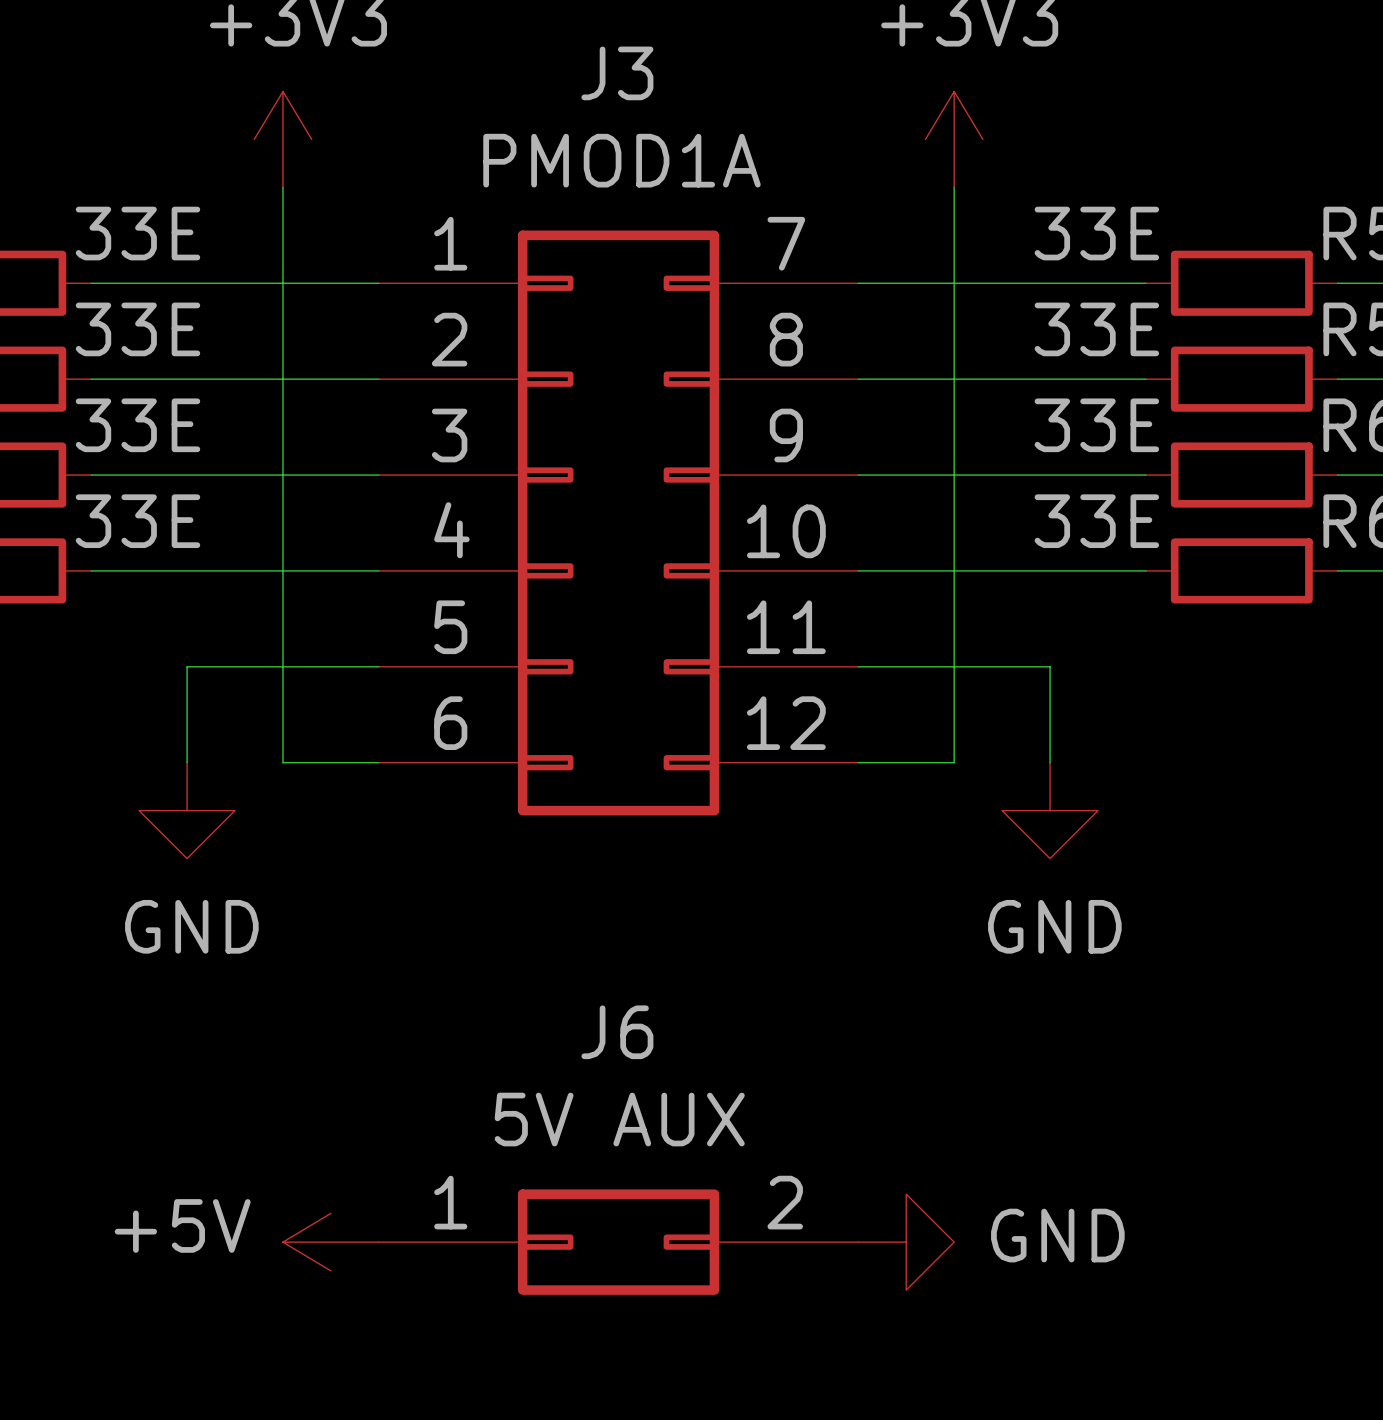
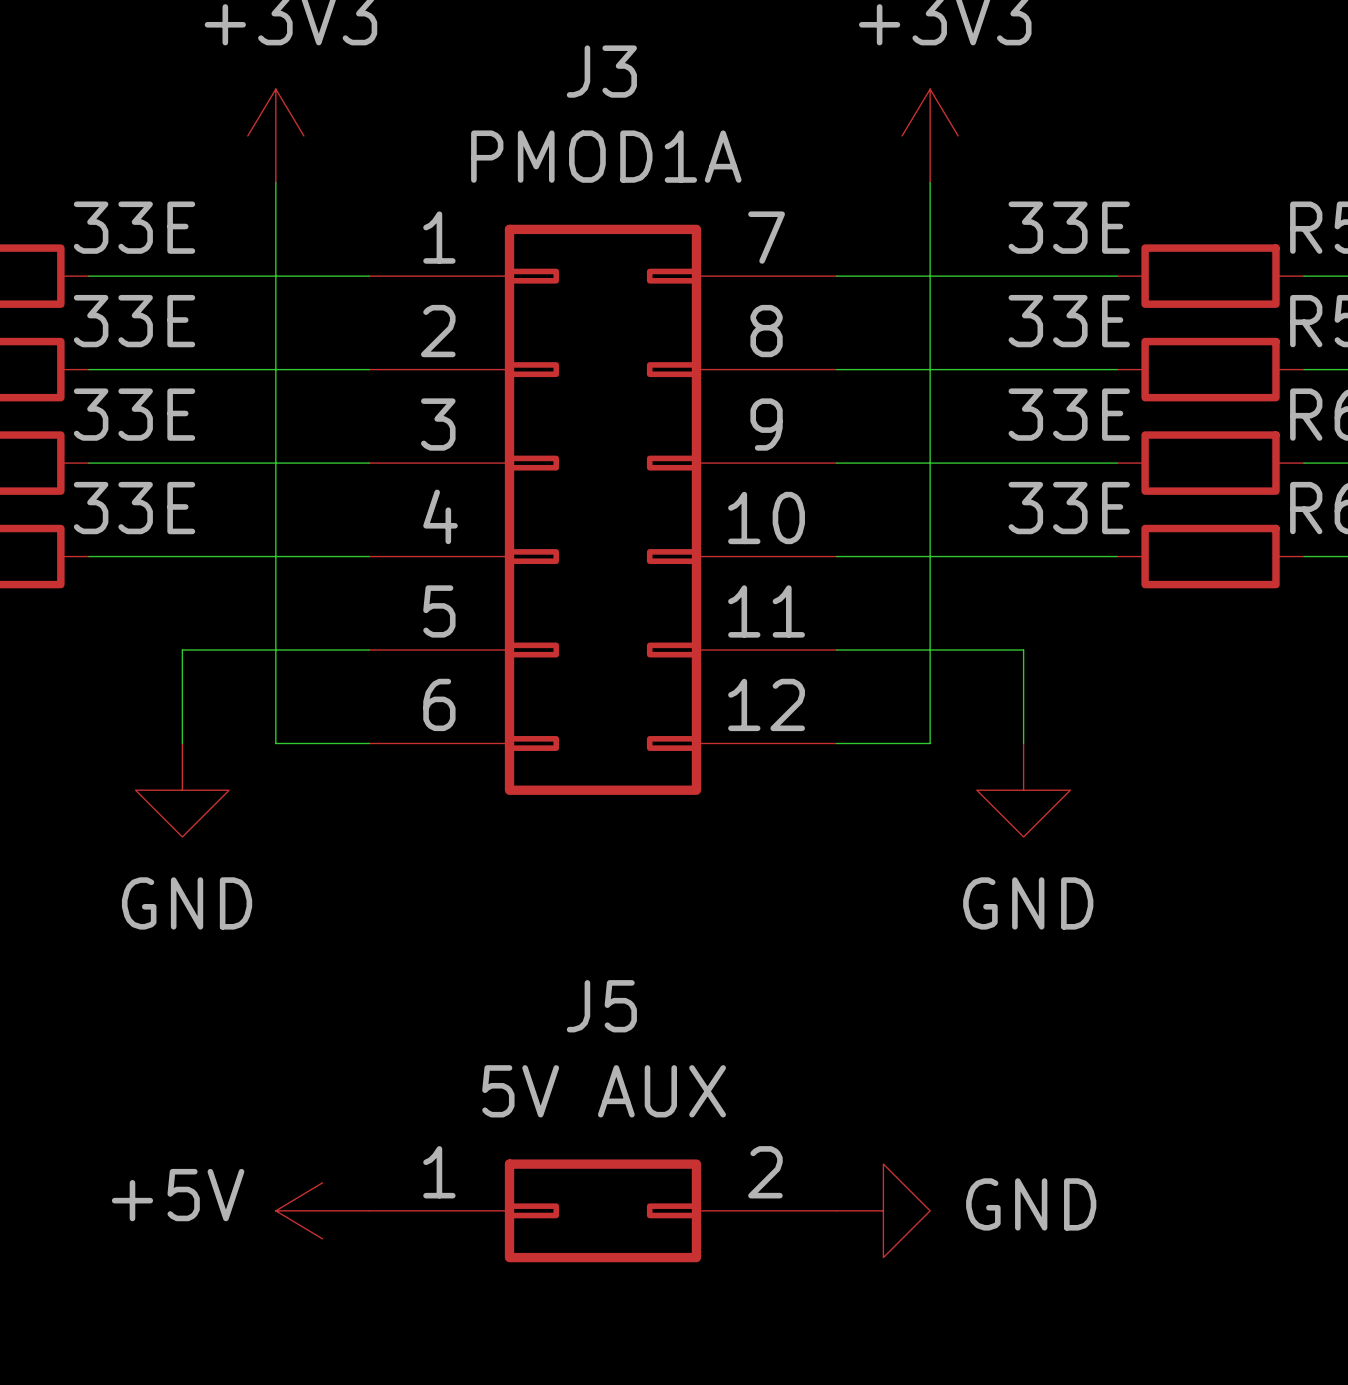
J6 name: J6 (617, 1032) -> J5 (601, 1006)

